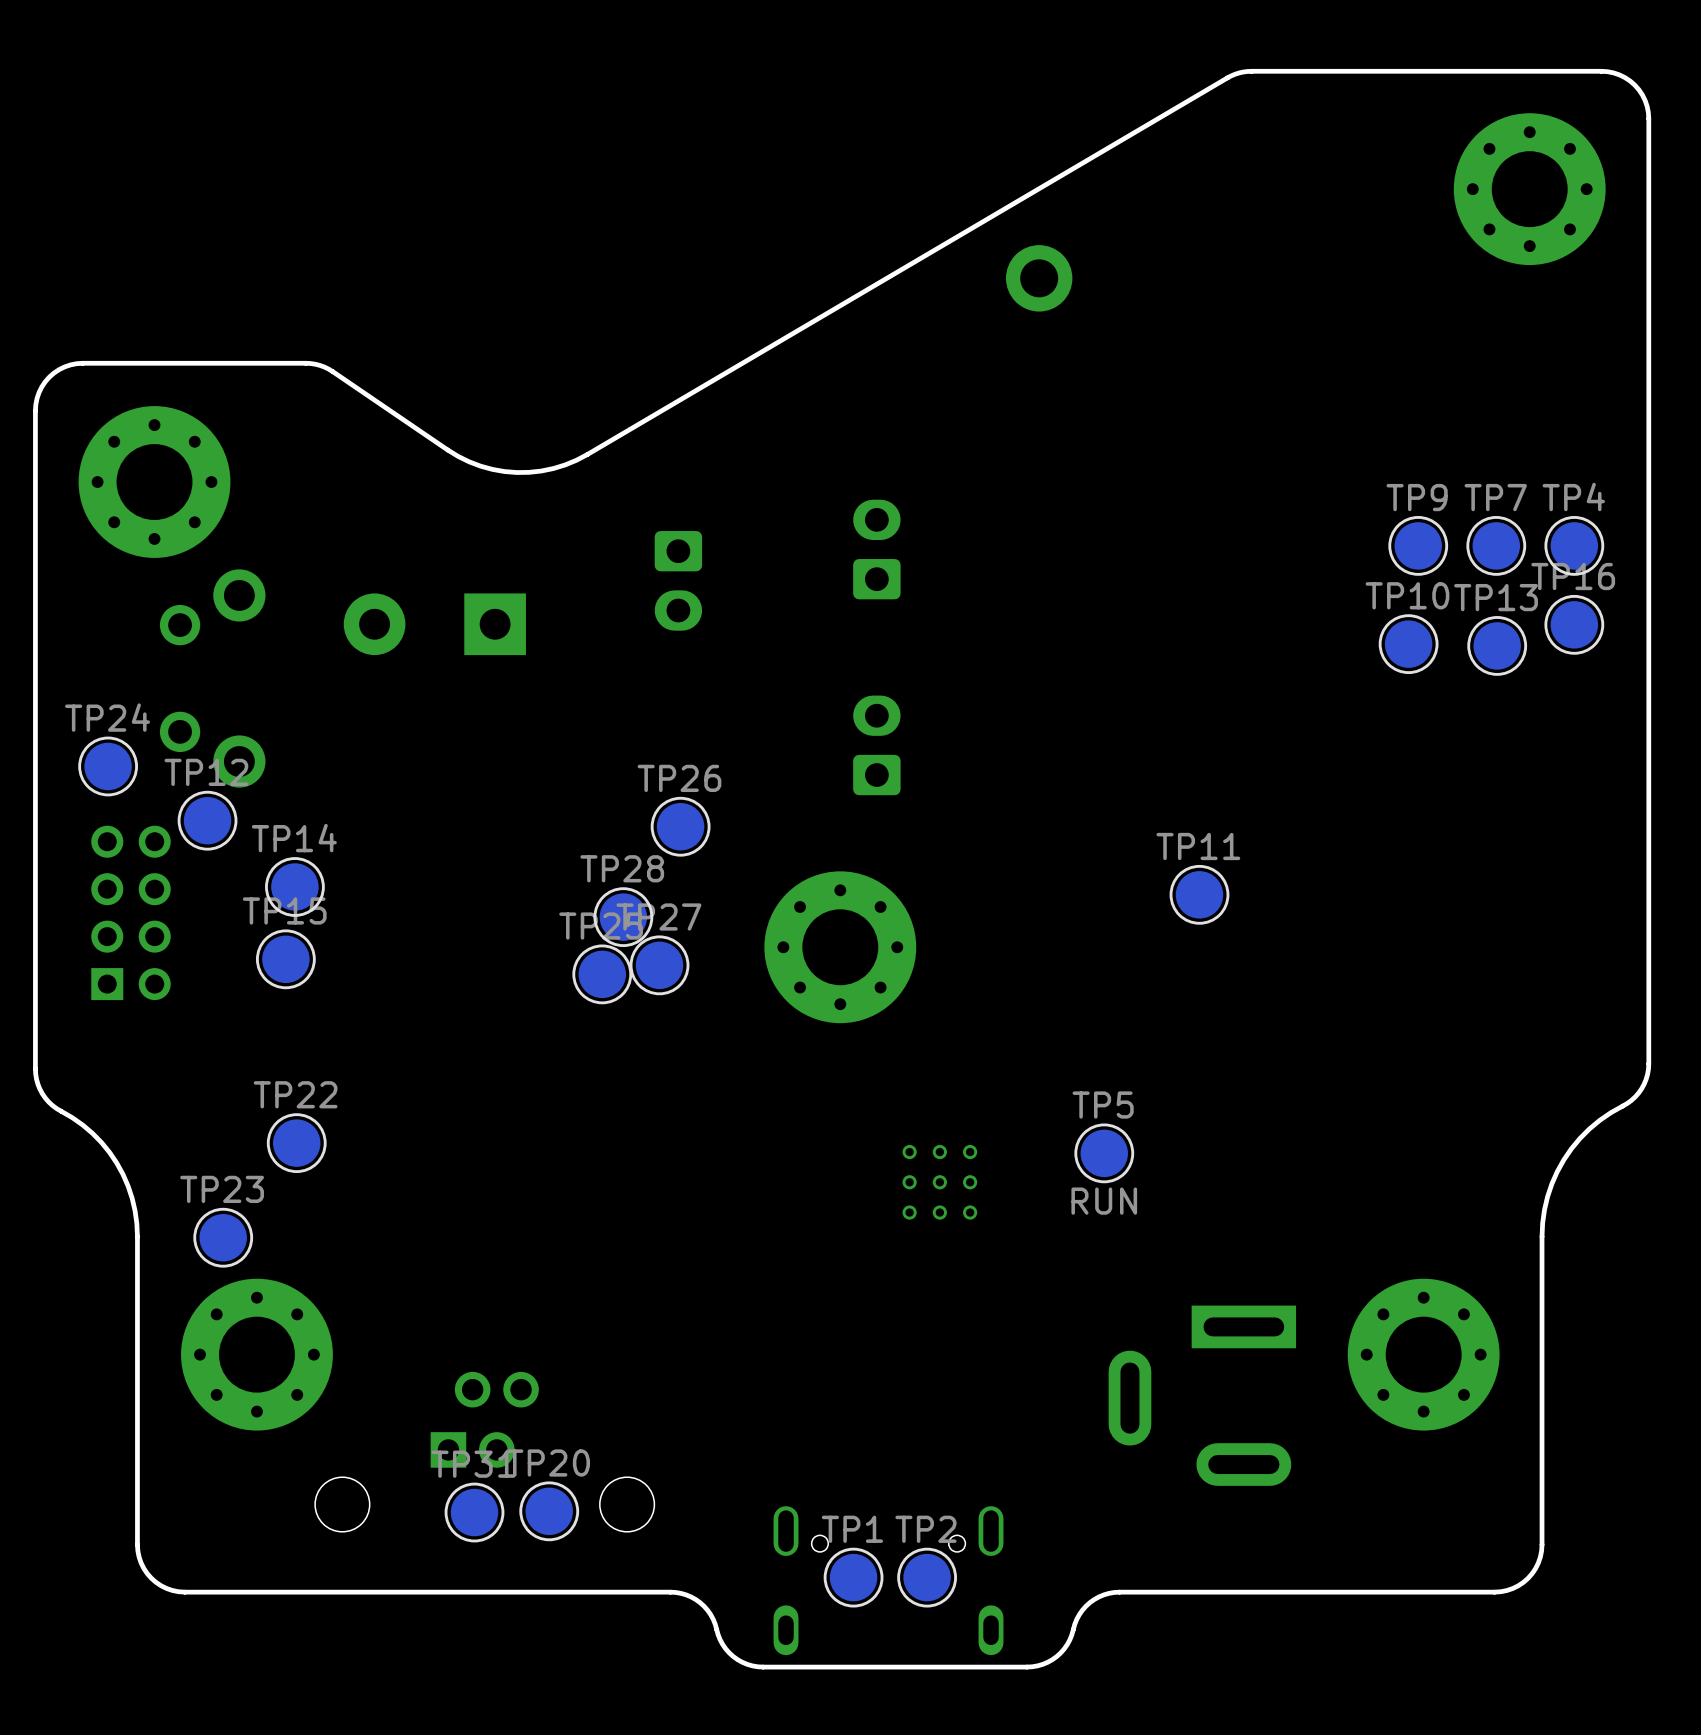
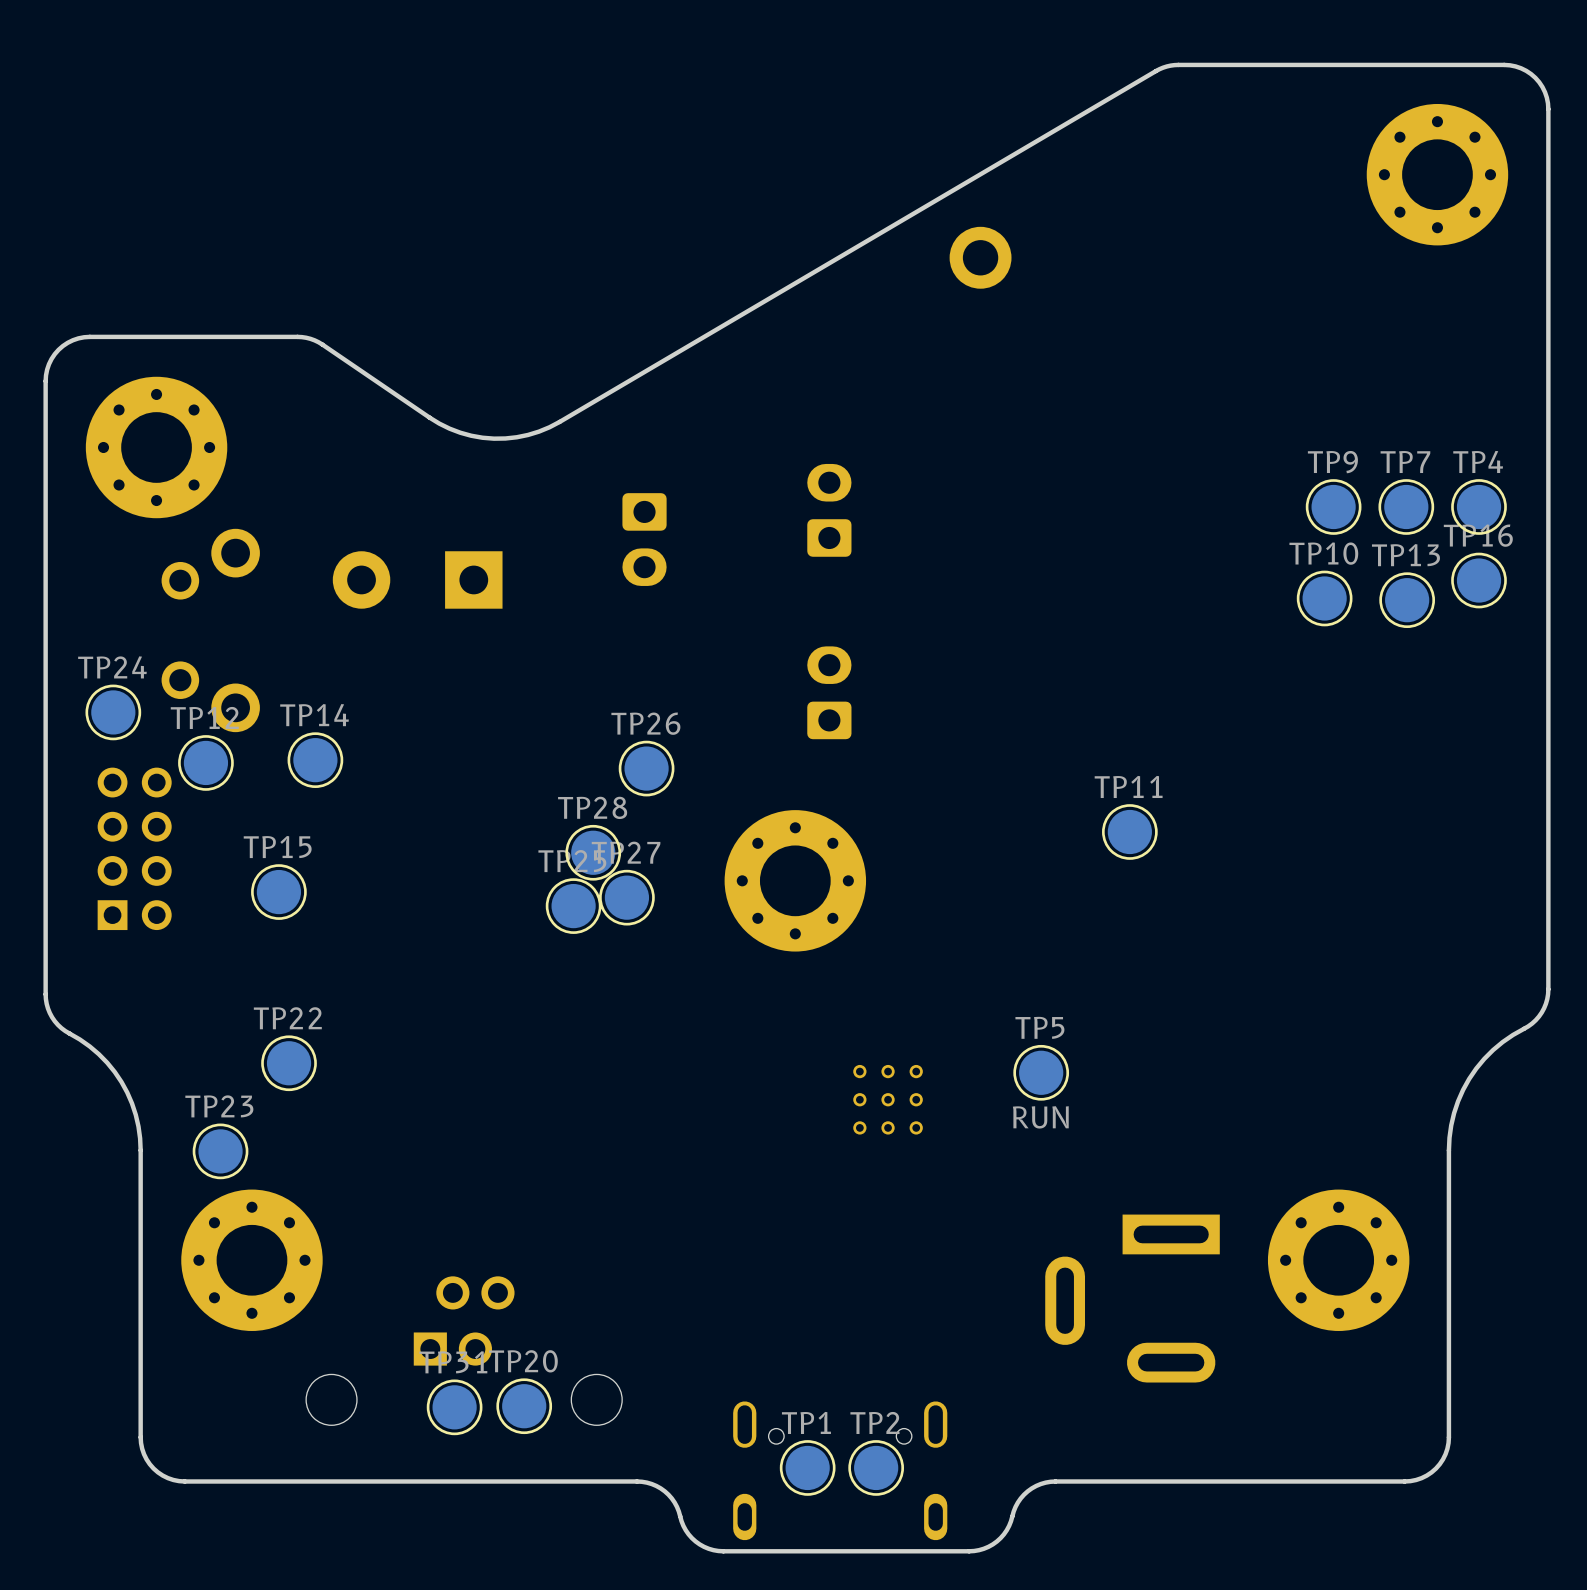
TP14 position: (294, 886) -> (315, 760)

